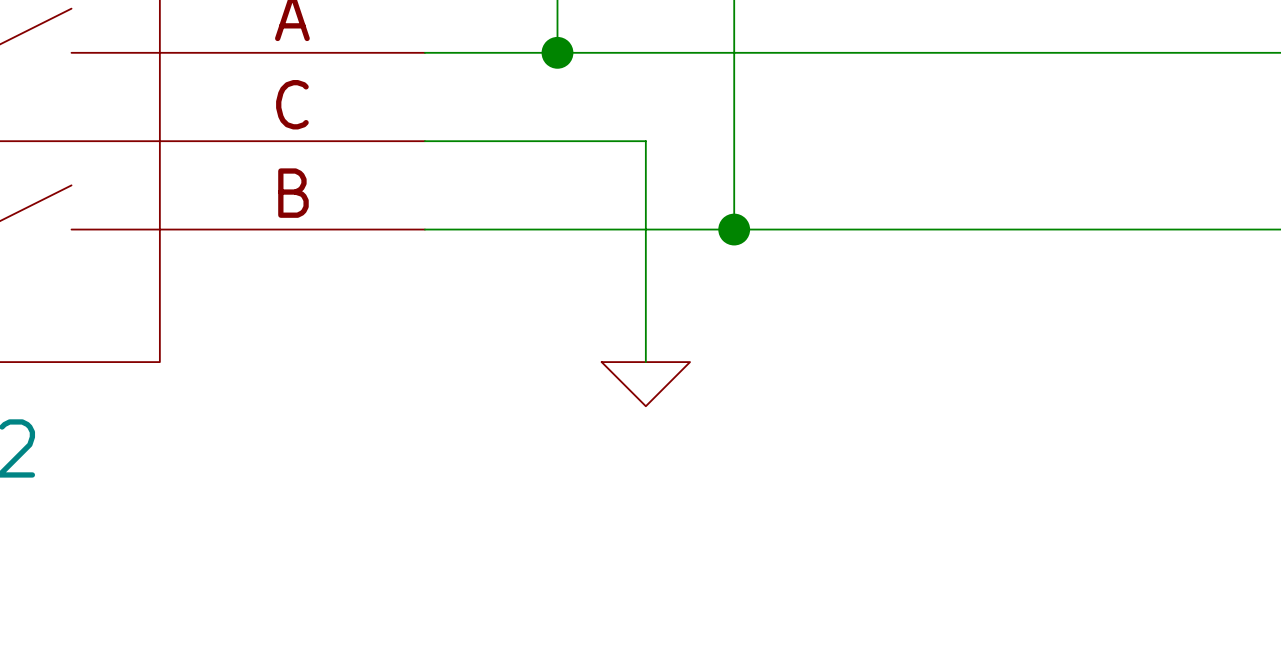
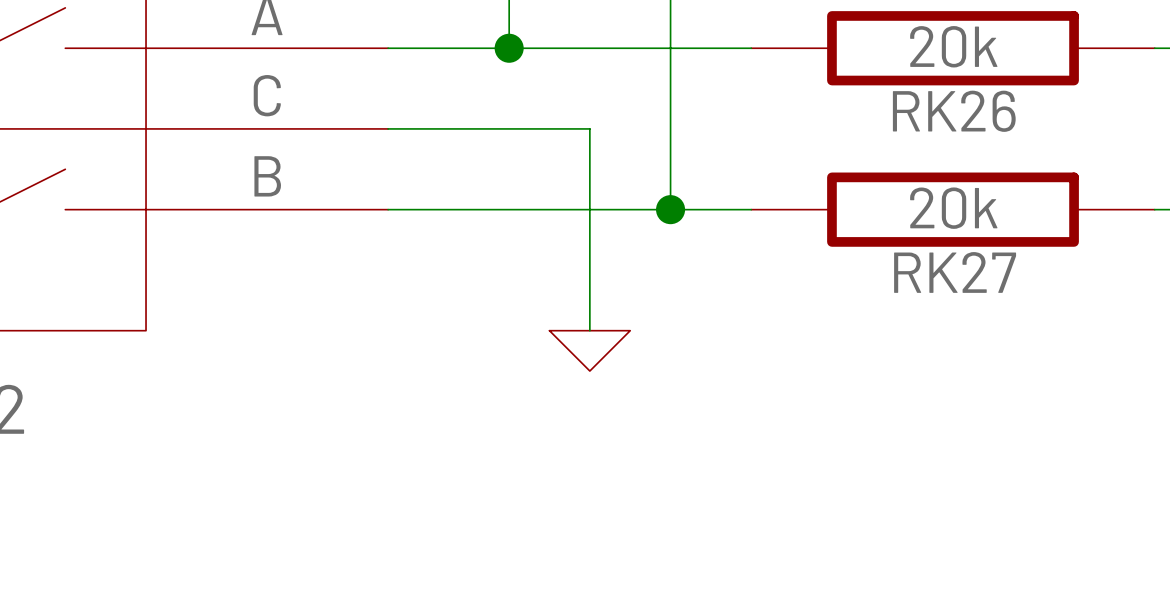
wire: (822, 52) (1264, 52) -> none
RK26: none -> 20k (953, 48)
wire: (822, 229) (1264, 229) -> none
RK27: none -> 20k (953, 209)

